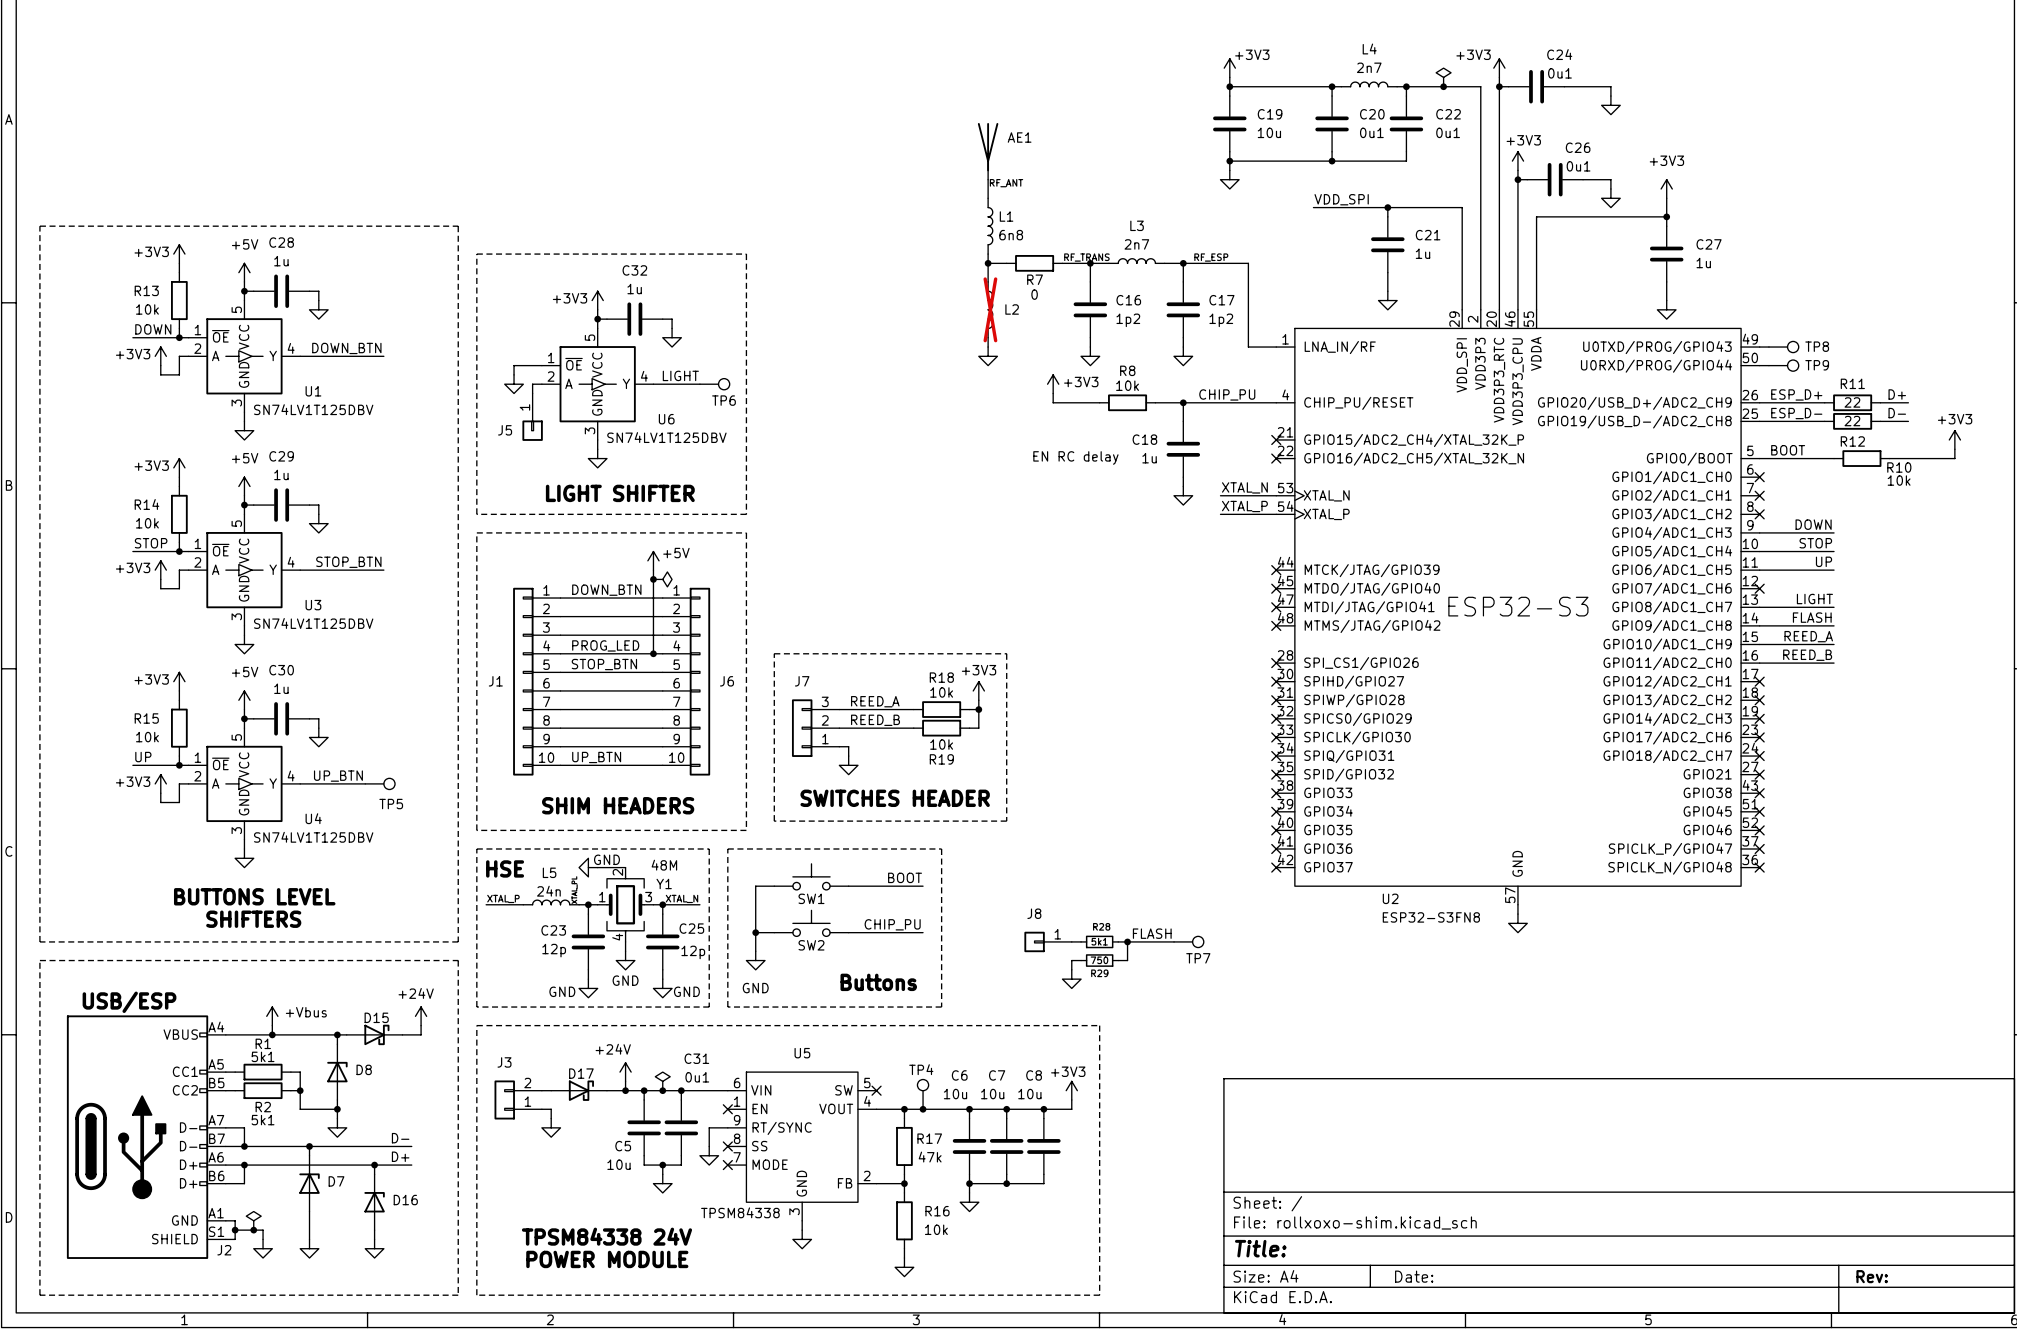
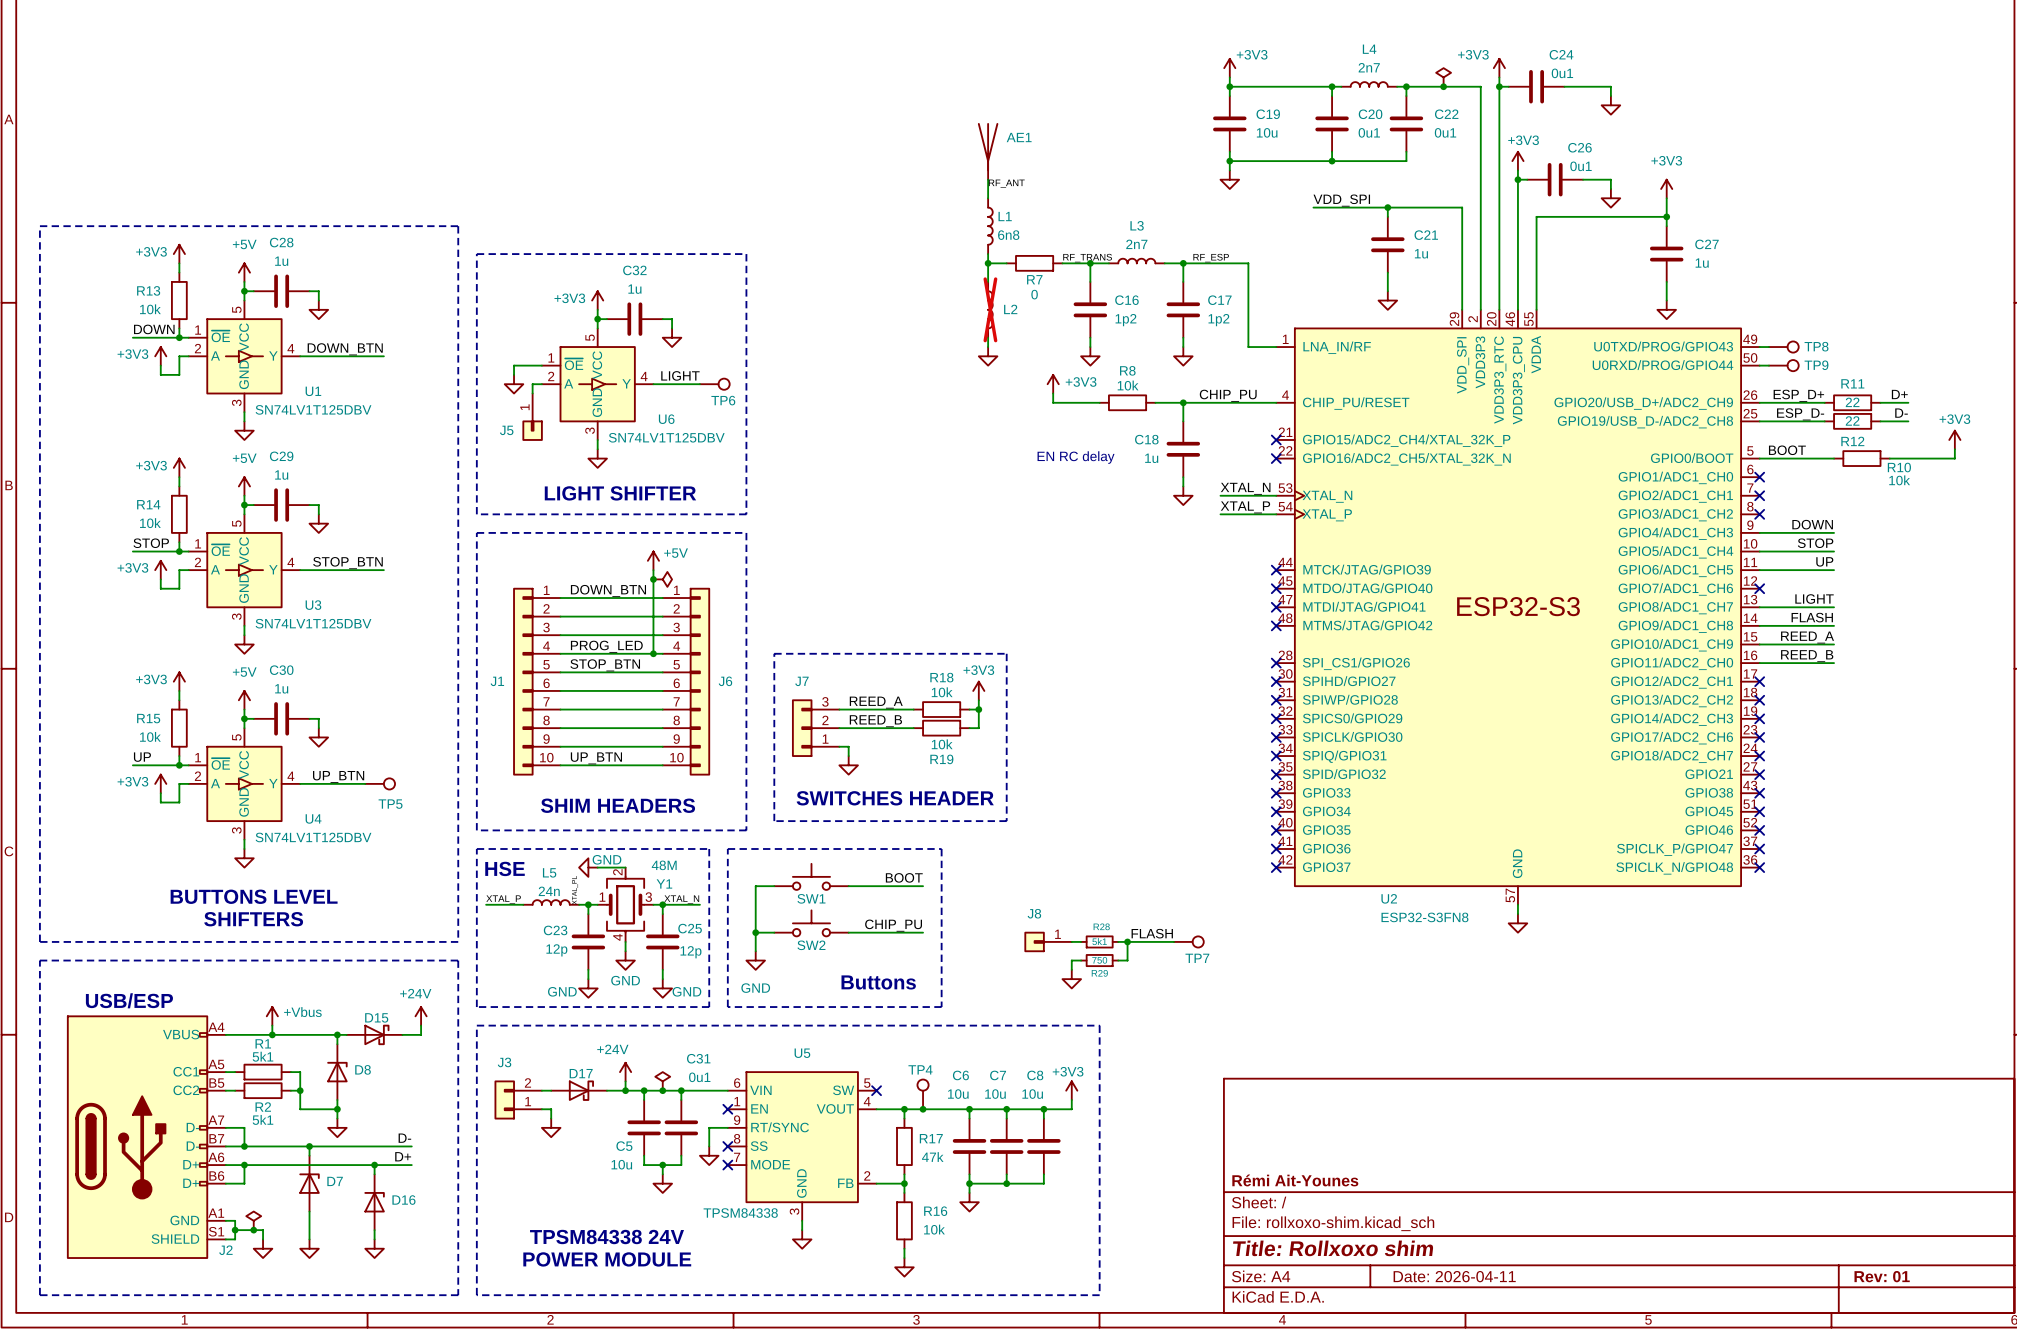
title block: none -> Rémi Ait-Younes (1295, 1180)
title block: Title: (1260, 1248) -> Title: Rollxoxo shim (1333, 1248)
title block: Date: (1414, 1276) -> Date: 2026-04-11 (1454, 1276)
title block: Rev: (1872, 1276) -> Rev: 01 (1882, 1276)

